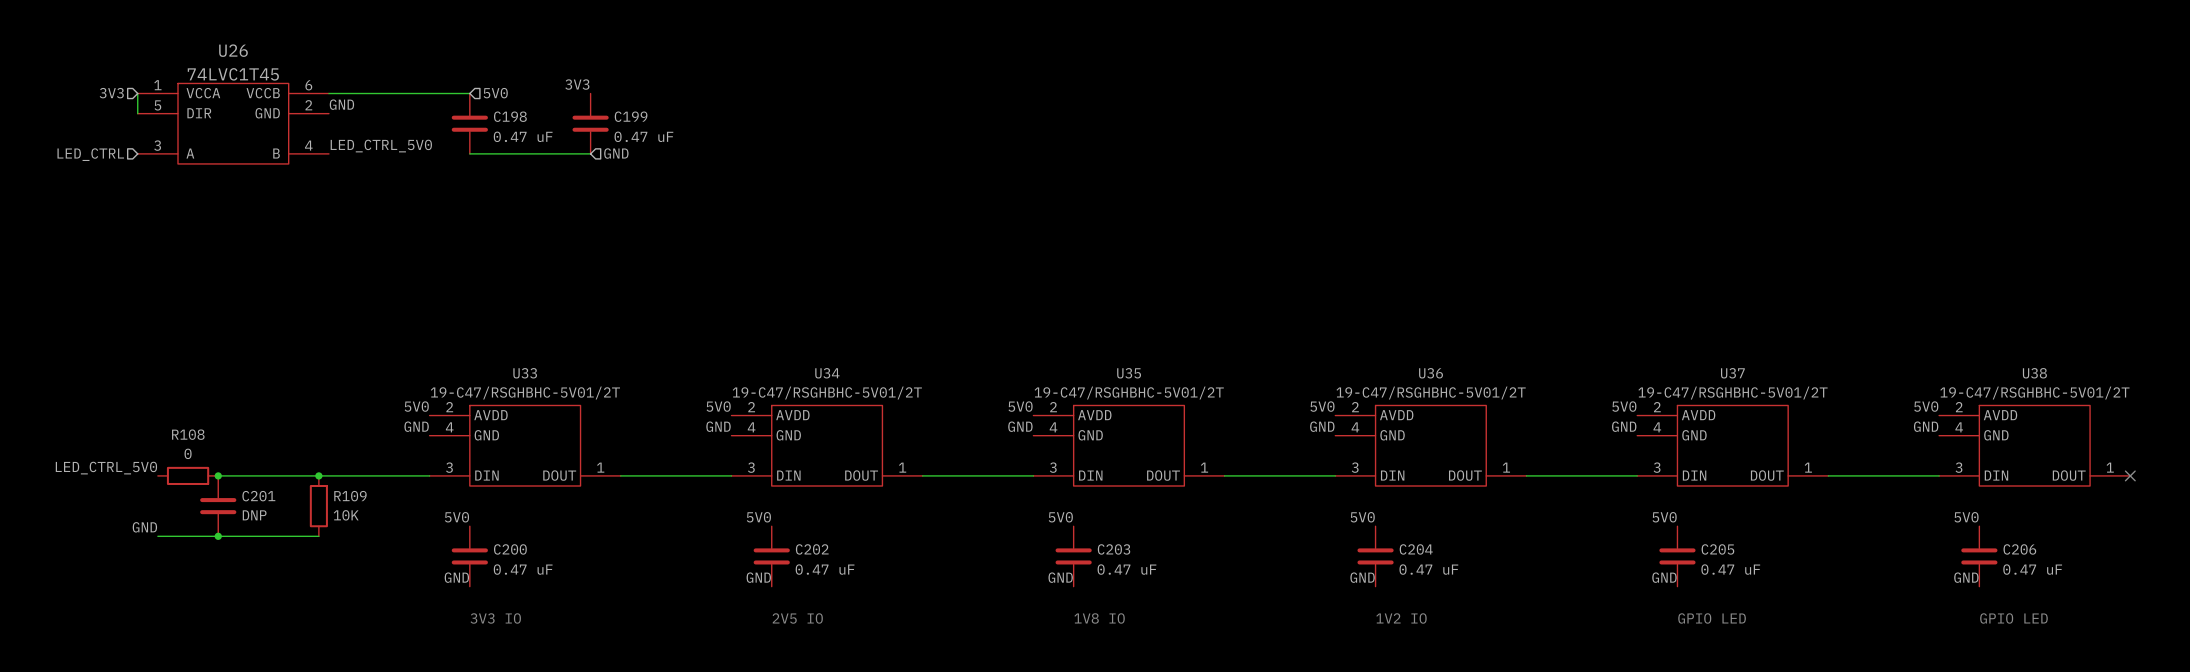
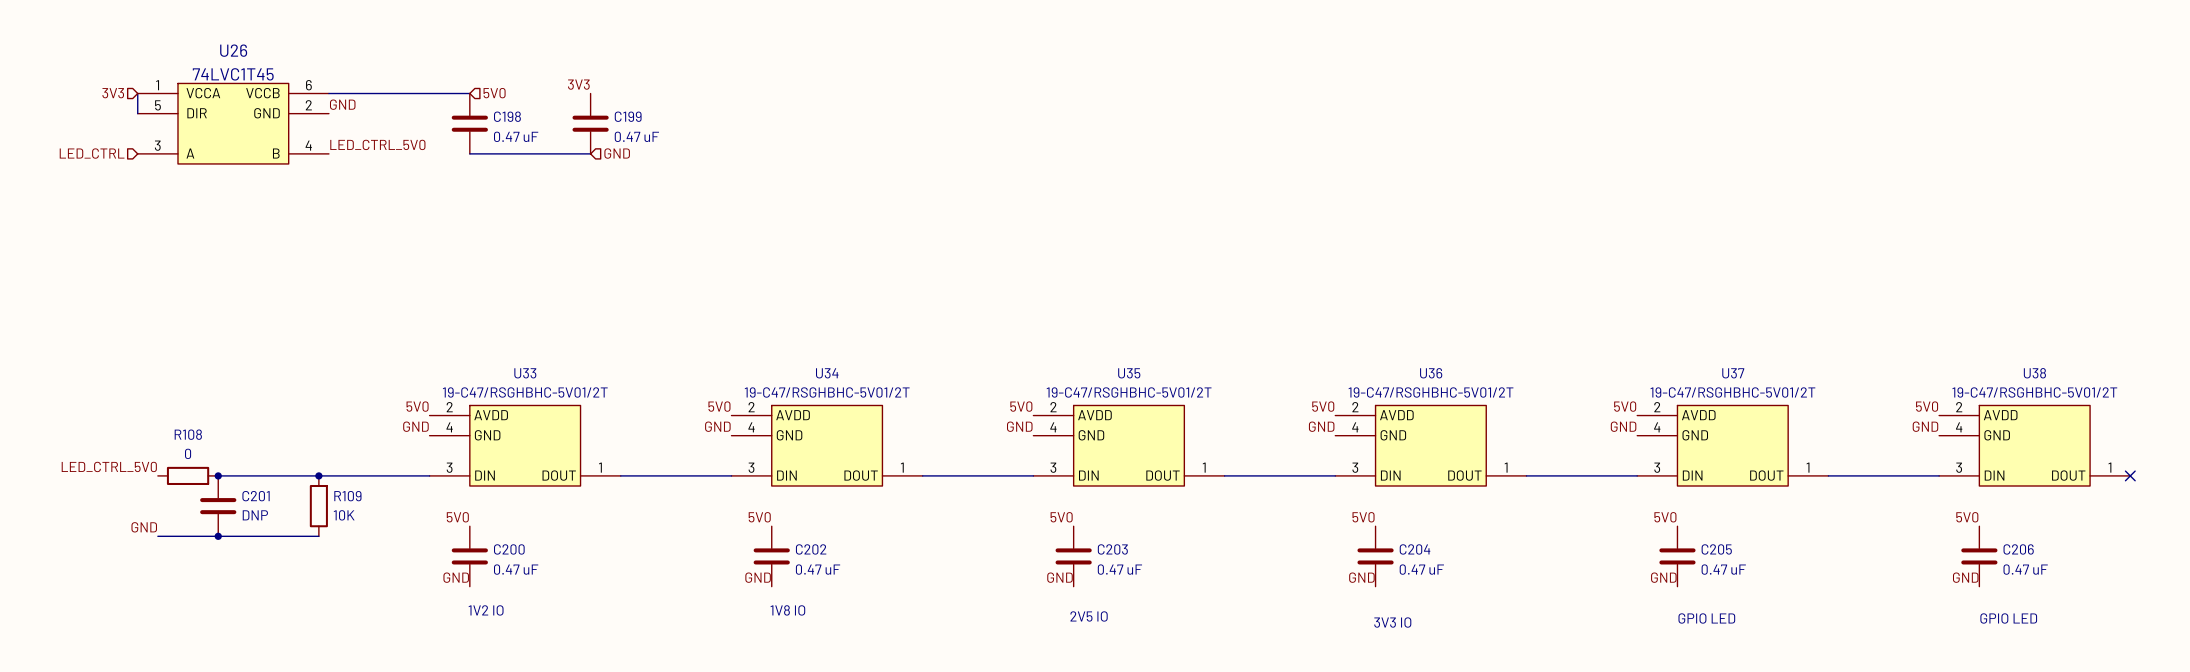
text: 3V3 IO (495, 618) -> 1V2 IO (486, 610)
text: 2V5 IO (797, 618) -> 1V8 IO (787, 610)
text: 1V8 IO (1099, 618) -> 2V5 IO (1089, 616)
text: 1V2 IO (1401, 618) -> 3V3 IO (1392, 622)

